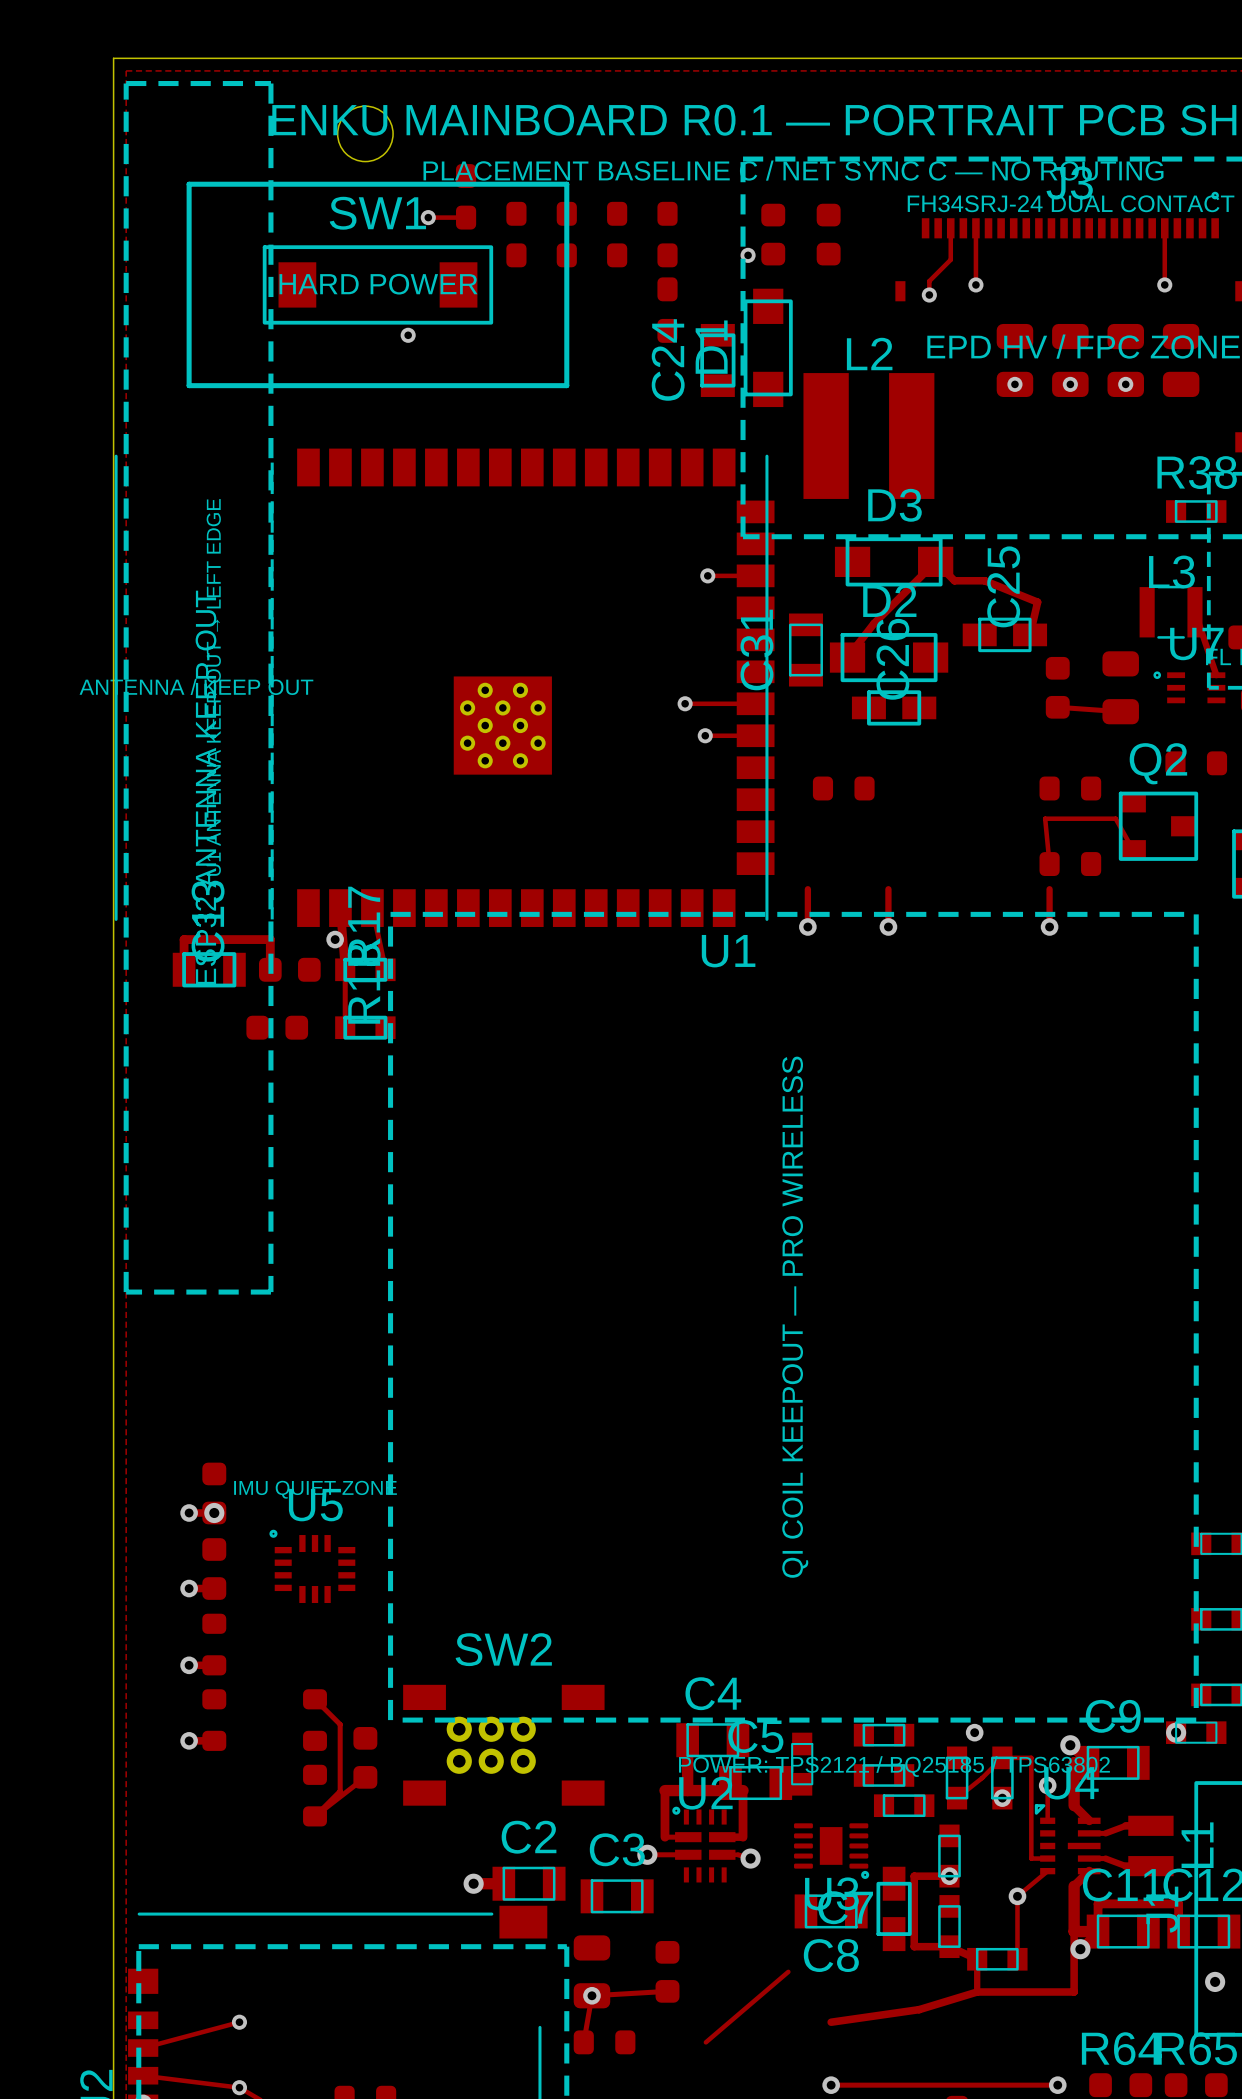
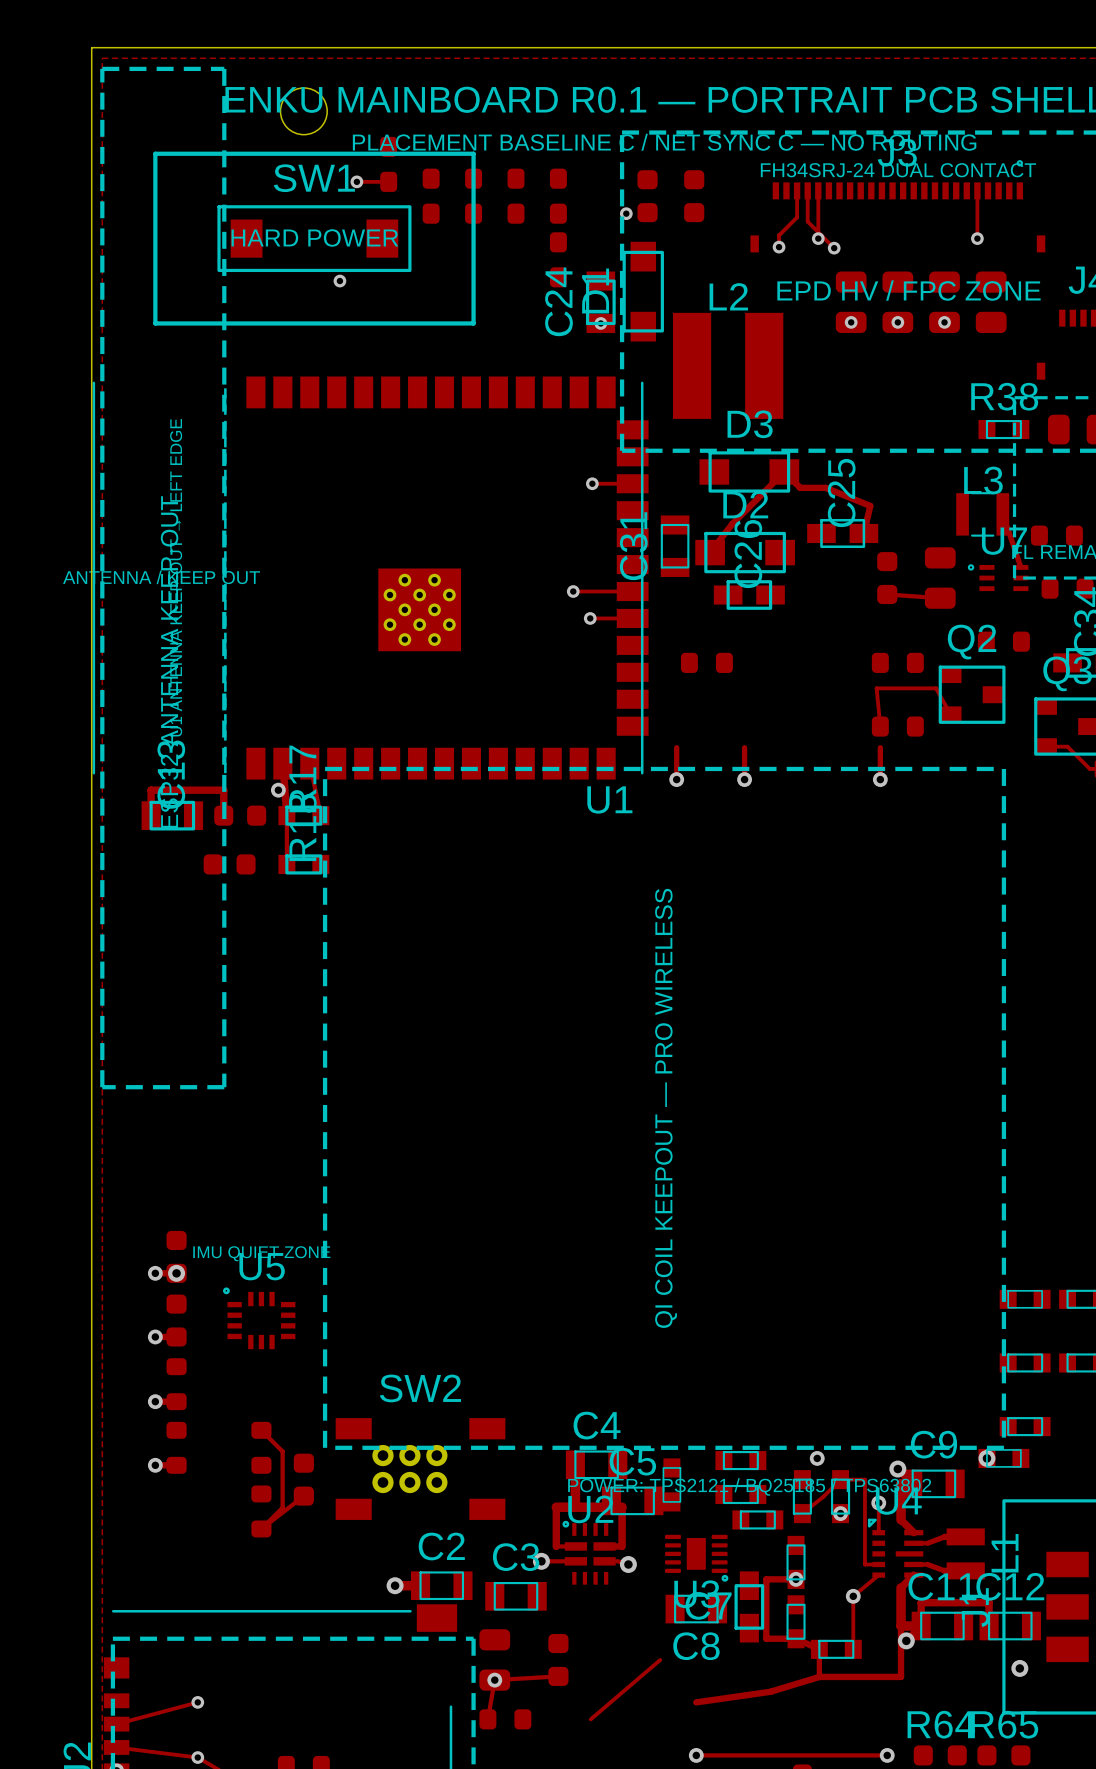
track: none -> (807, 190) (807, 221) (834, 248)
via: none -> (834, 248)
via: none -> (600, 323)

